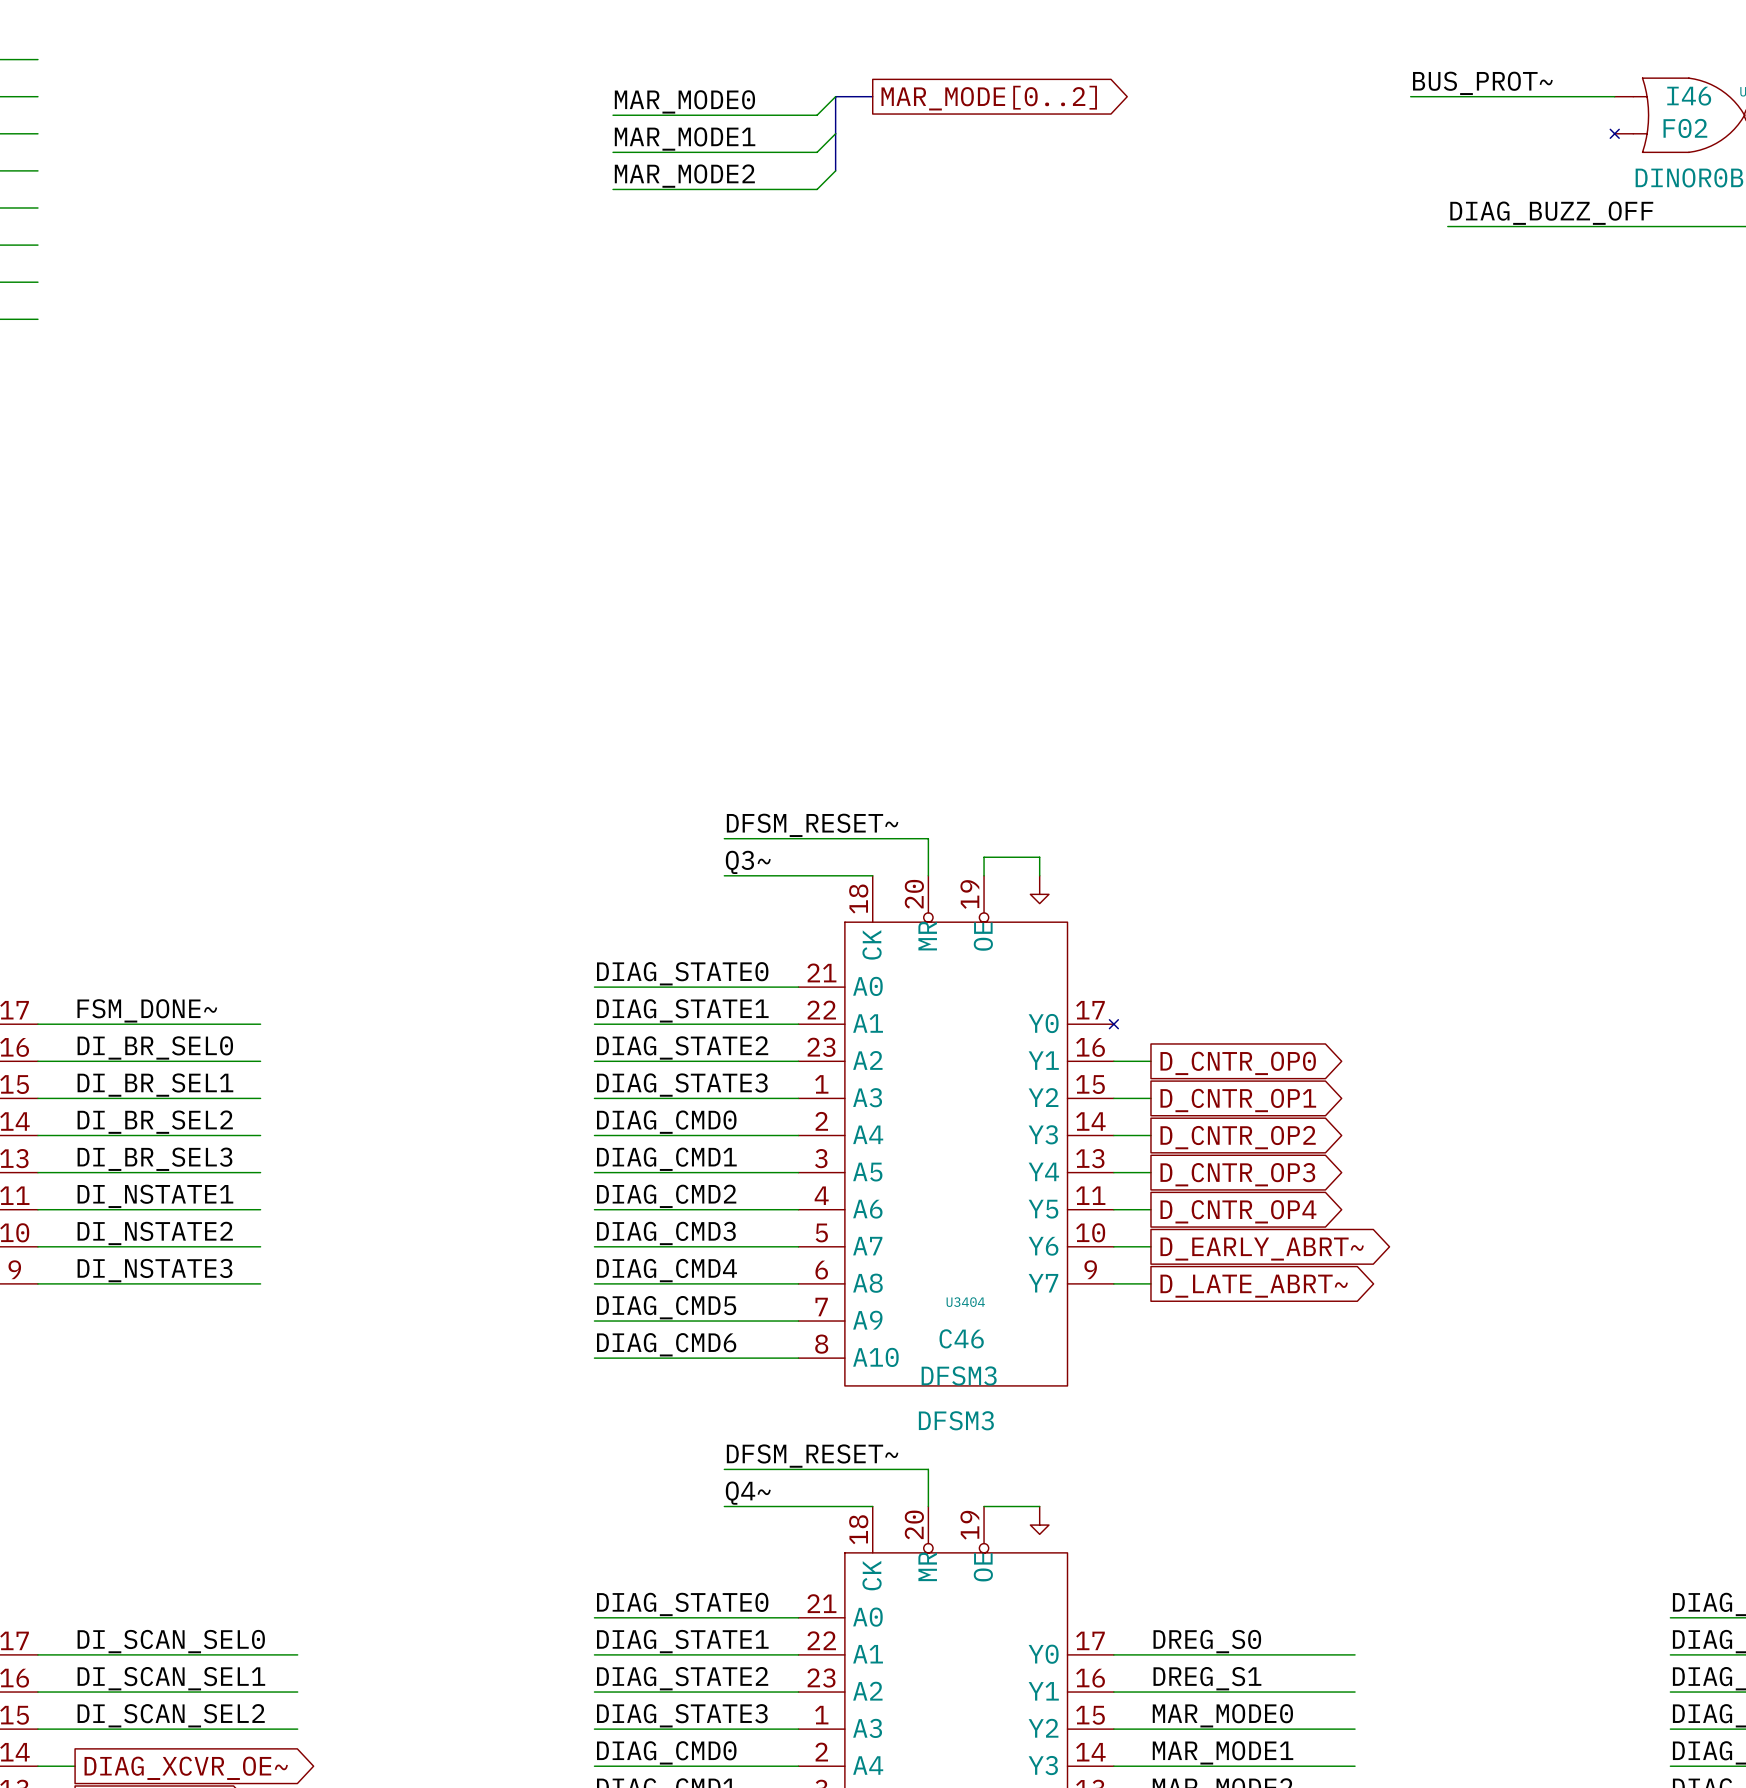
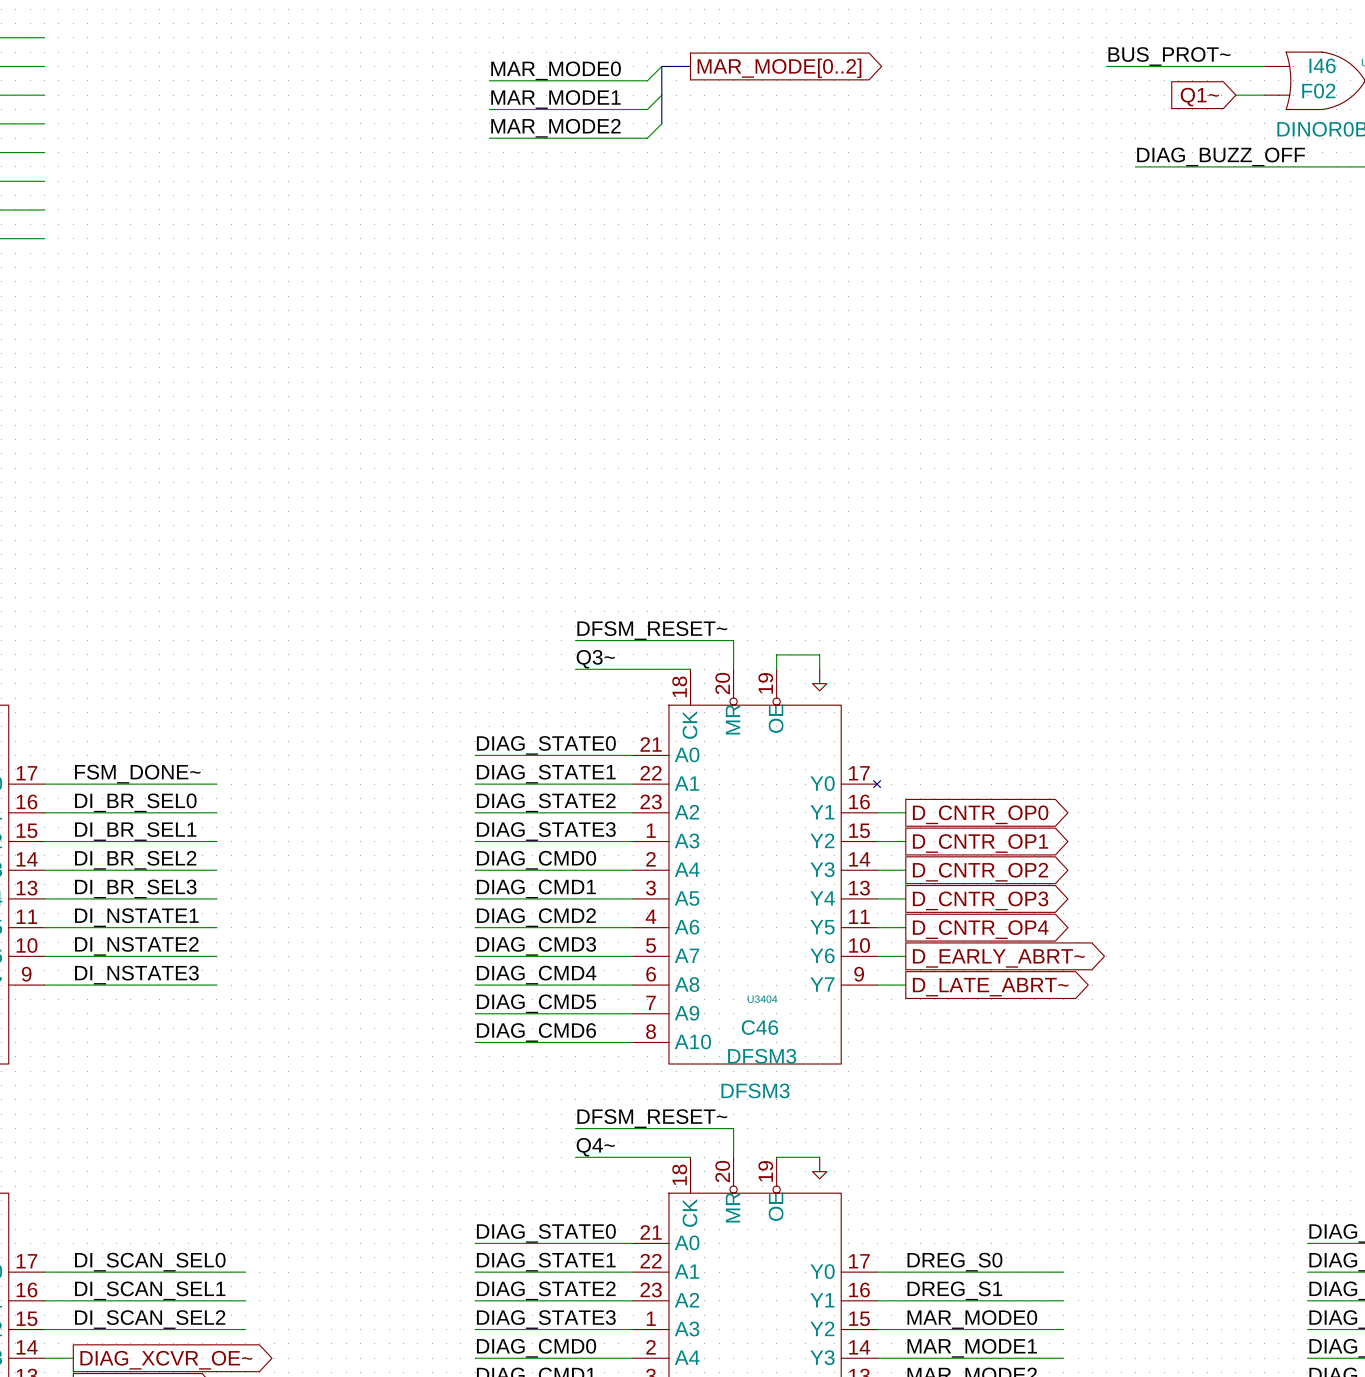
wire: none -> (1235, 95) (1264, 95)
no-connect mark: (1614, 133) -> none
global label: none -> Q1~ (1199, 97)

